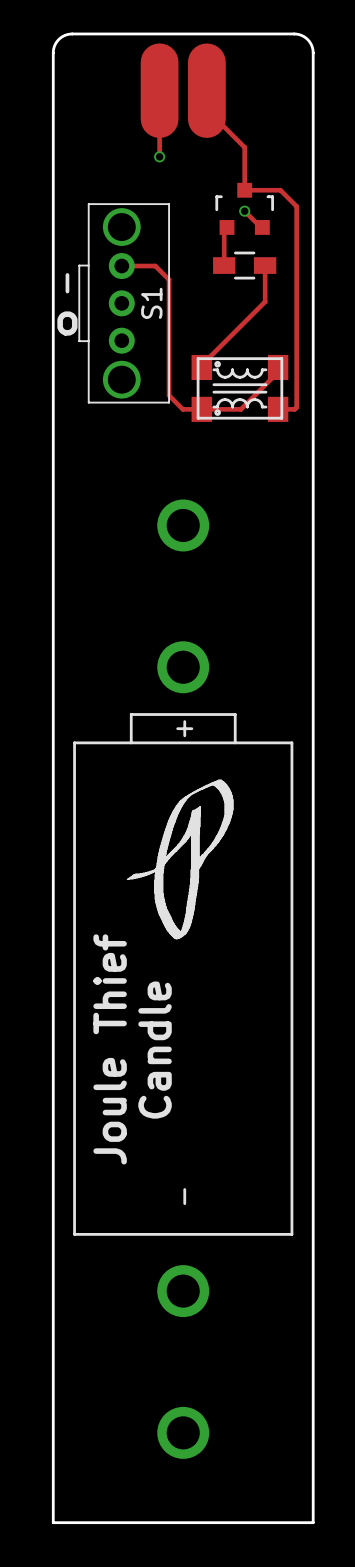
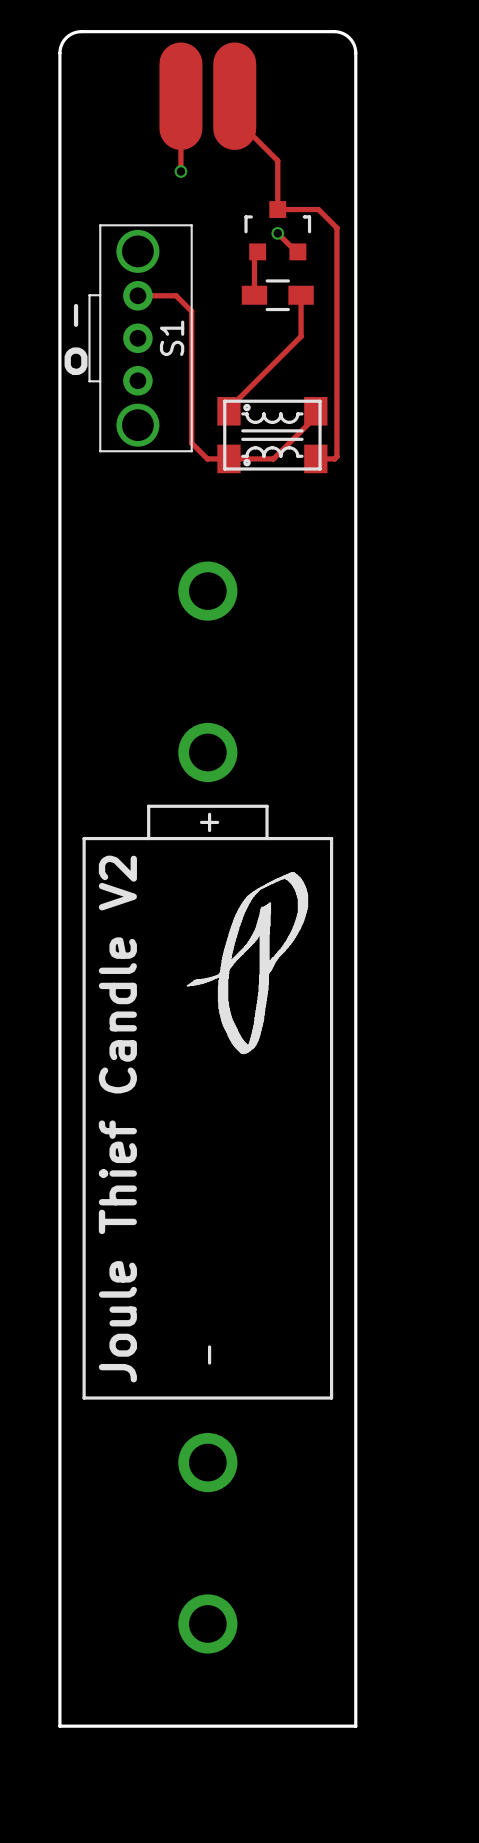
drawing position: (180, 859) -> (247, 963)
text: Joule Thief (110, 1049) -> Joule Thief Candle V2 (117, 1119)
text: Candle (155, 1050) -> none

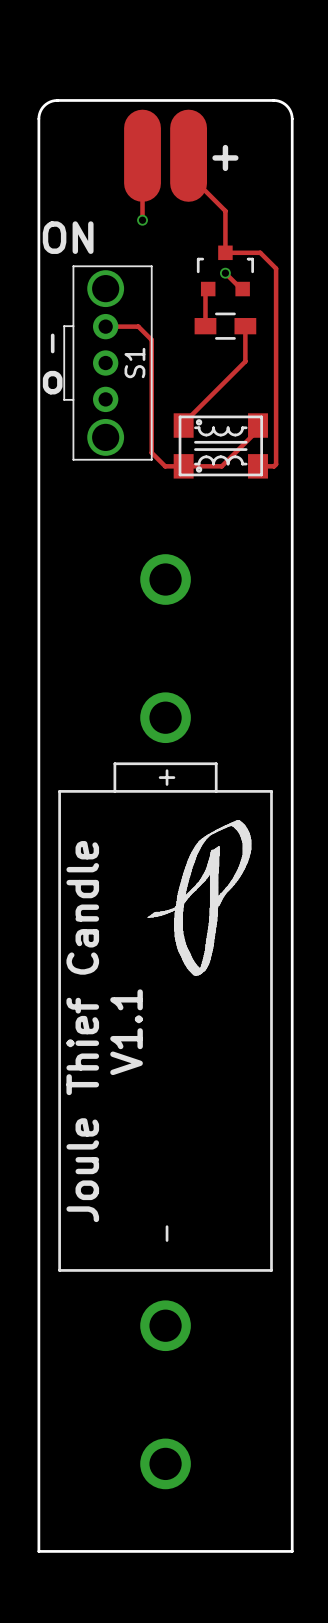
text: none -> + (225, 157)
text: none -> ON (68, 237)
text: Joule Thief Candle V2 (117, 1119) -> Joule Thief Candle (82, 1031)
text: none -> V1.1 (126, 1032)

